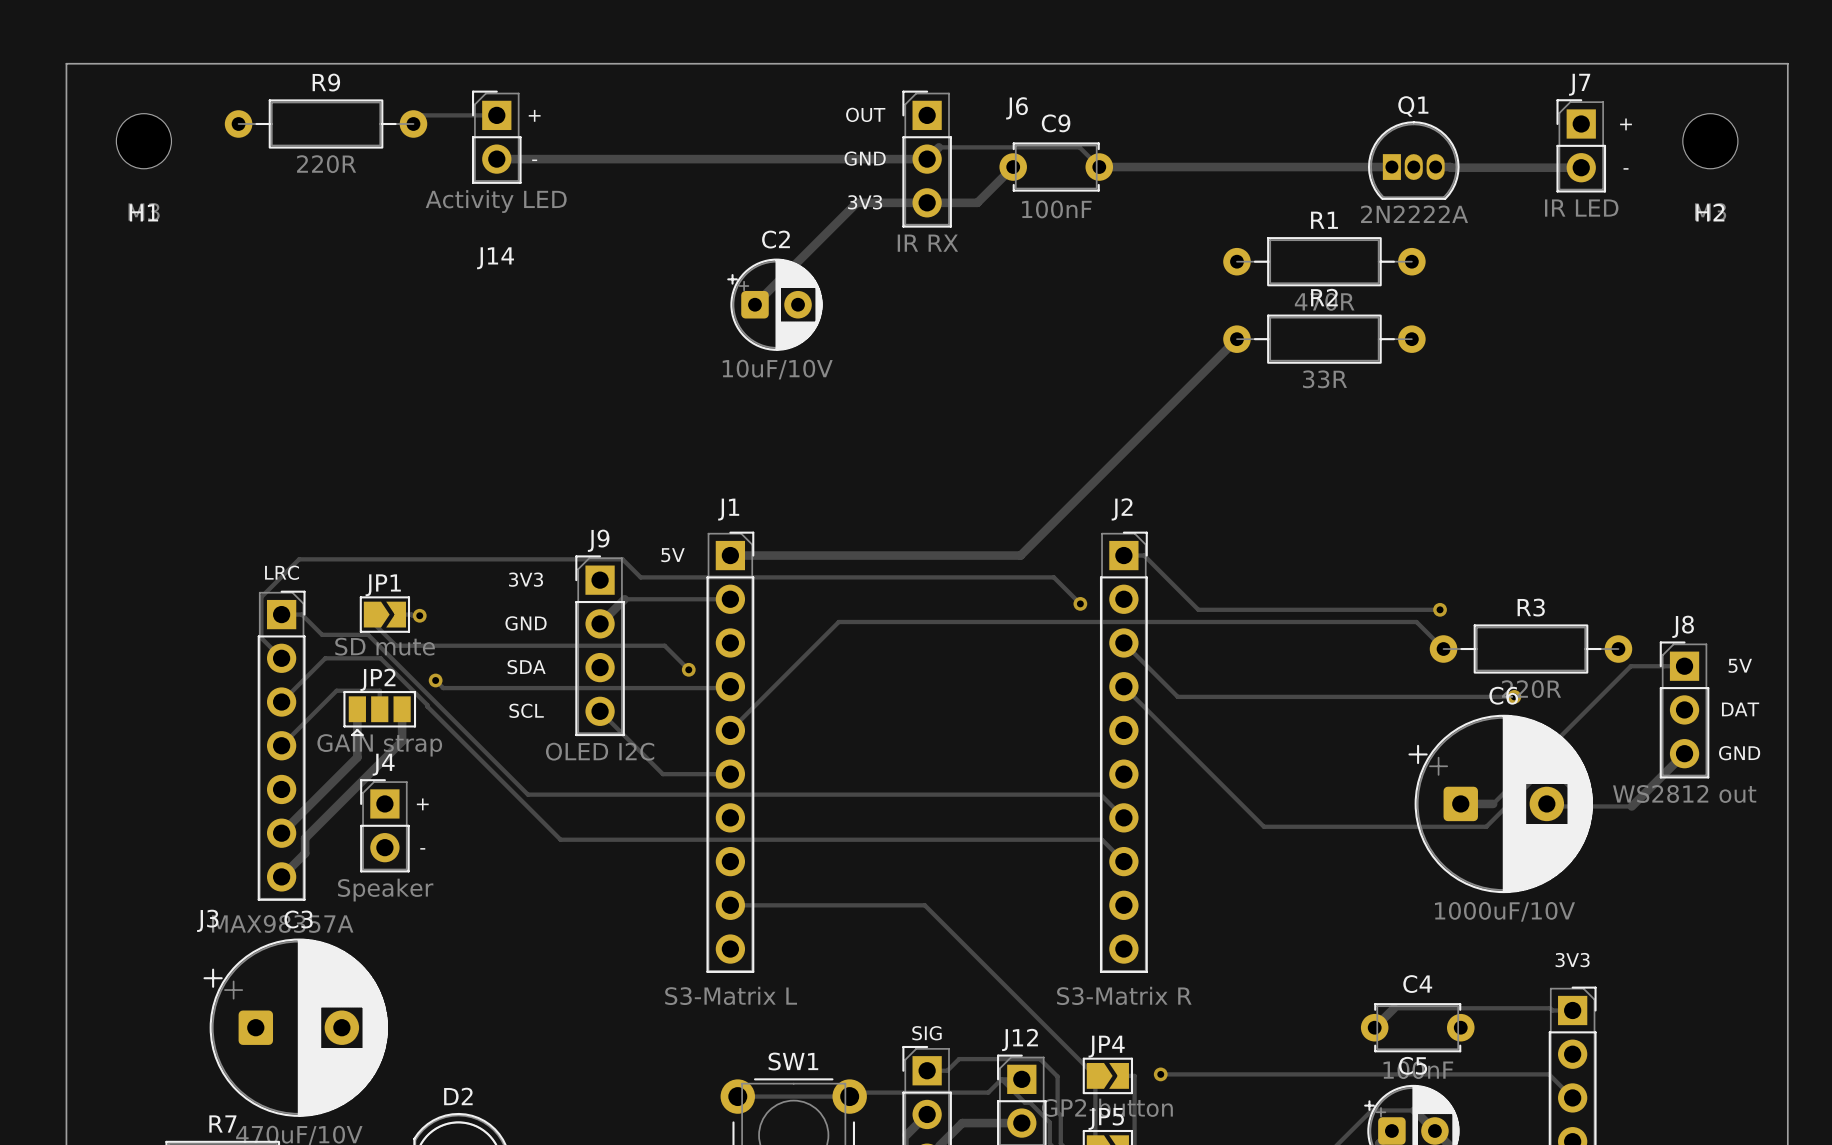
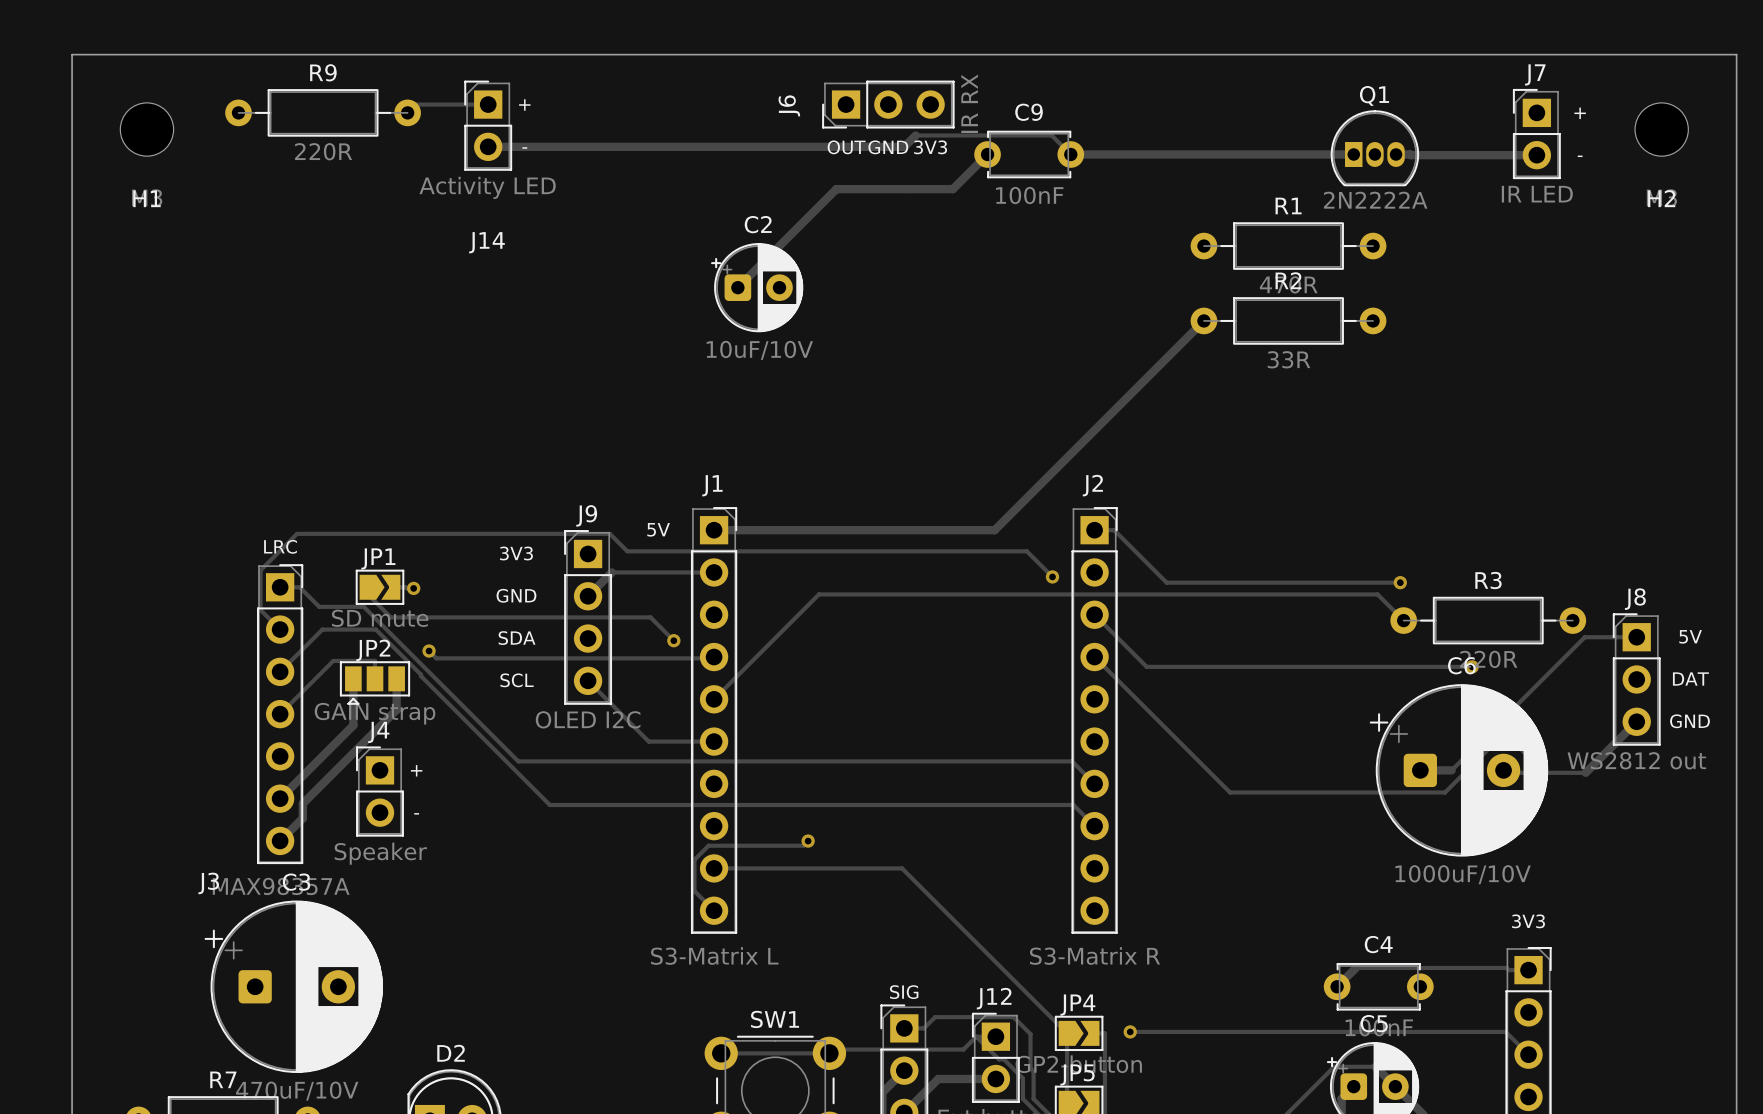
J6 name position: J6 (1017, 108) -> J6 (789, 105)
text: OUT (865, 114) -> none
text: GND (865, 158) -> OUT (846, 147)
text: none -> GND (888, 147)
J6 rotation: 0° (927, 159) -> 90° counterclockwise (888, 104)
text position: 3V3 (865, 202) -> 3V3 (930, 147)
track: none -> (808, 841) (803, 845) (708, 845) (694, 859) (694, 891) (714, 910)
via: none -> (808, 841)

